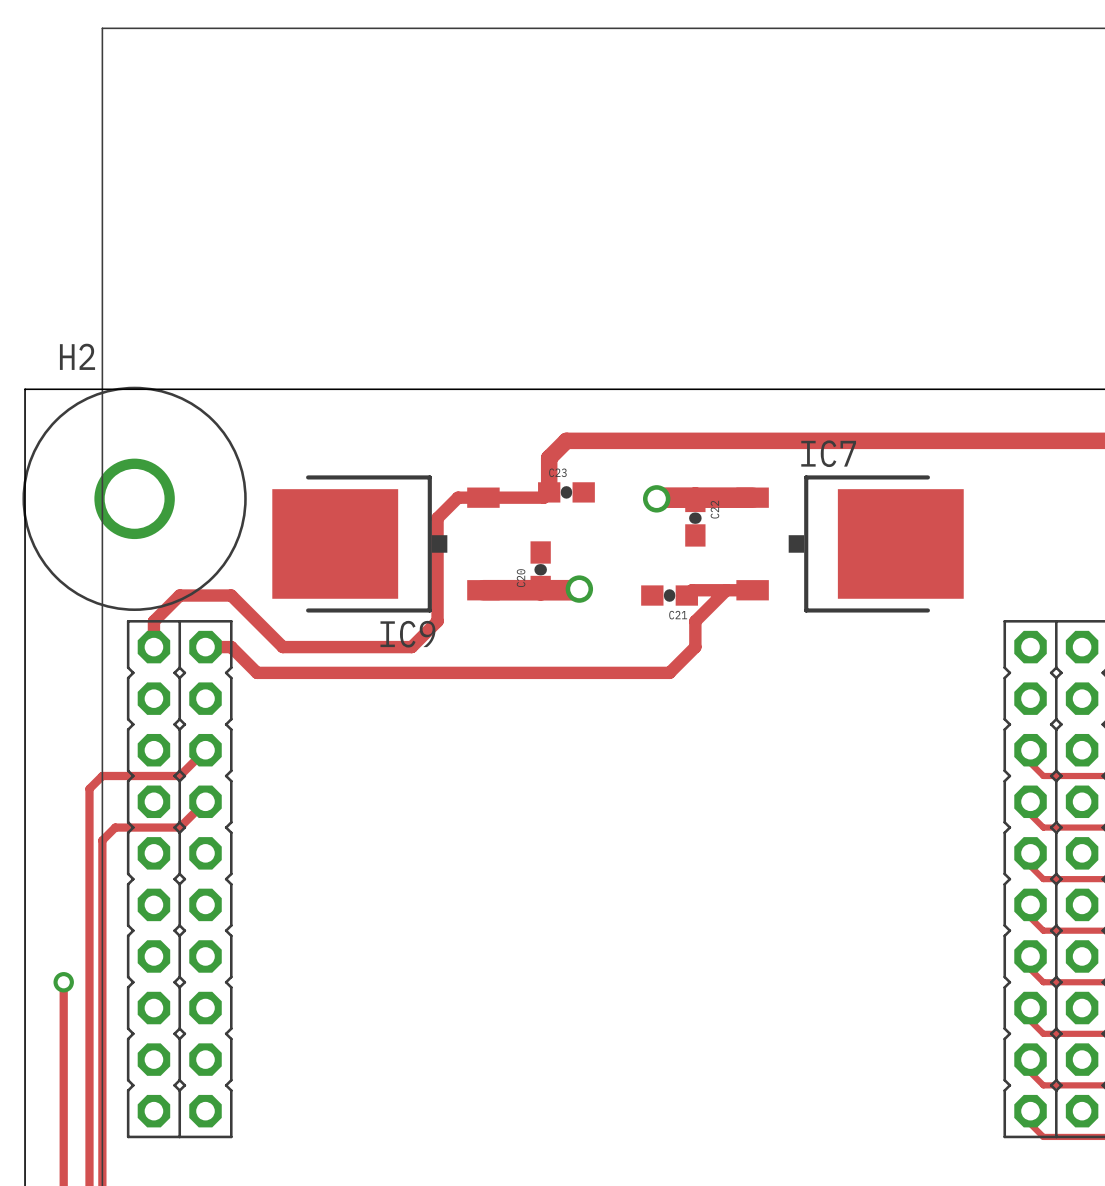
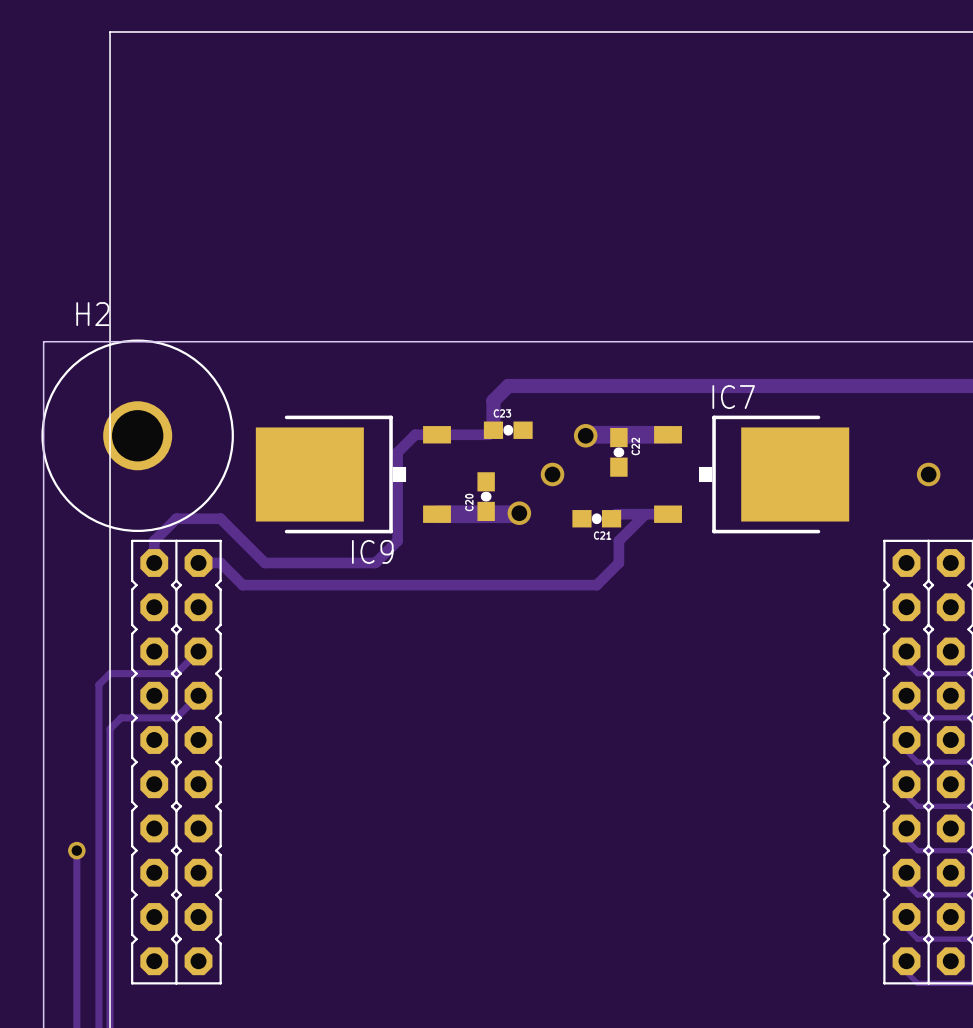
via: none -> (552, 474)
via: none -> (928, 474)

